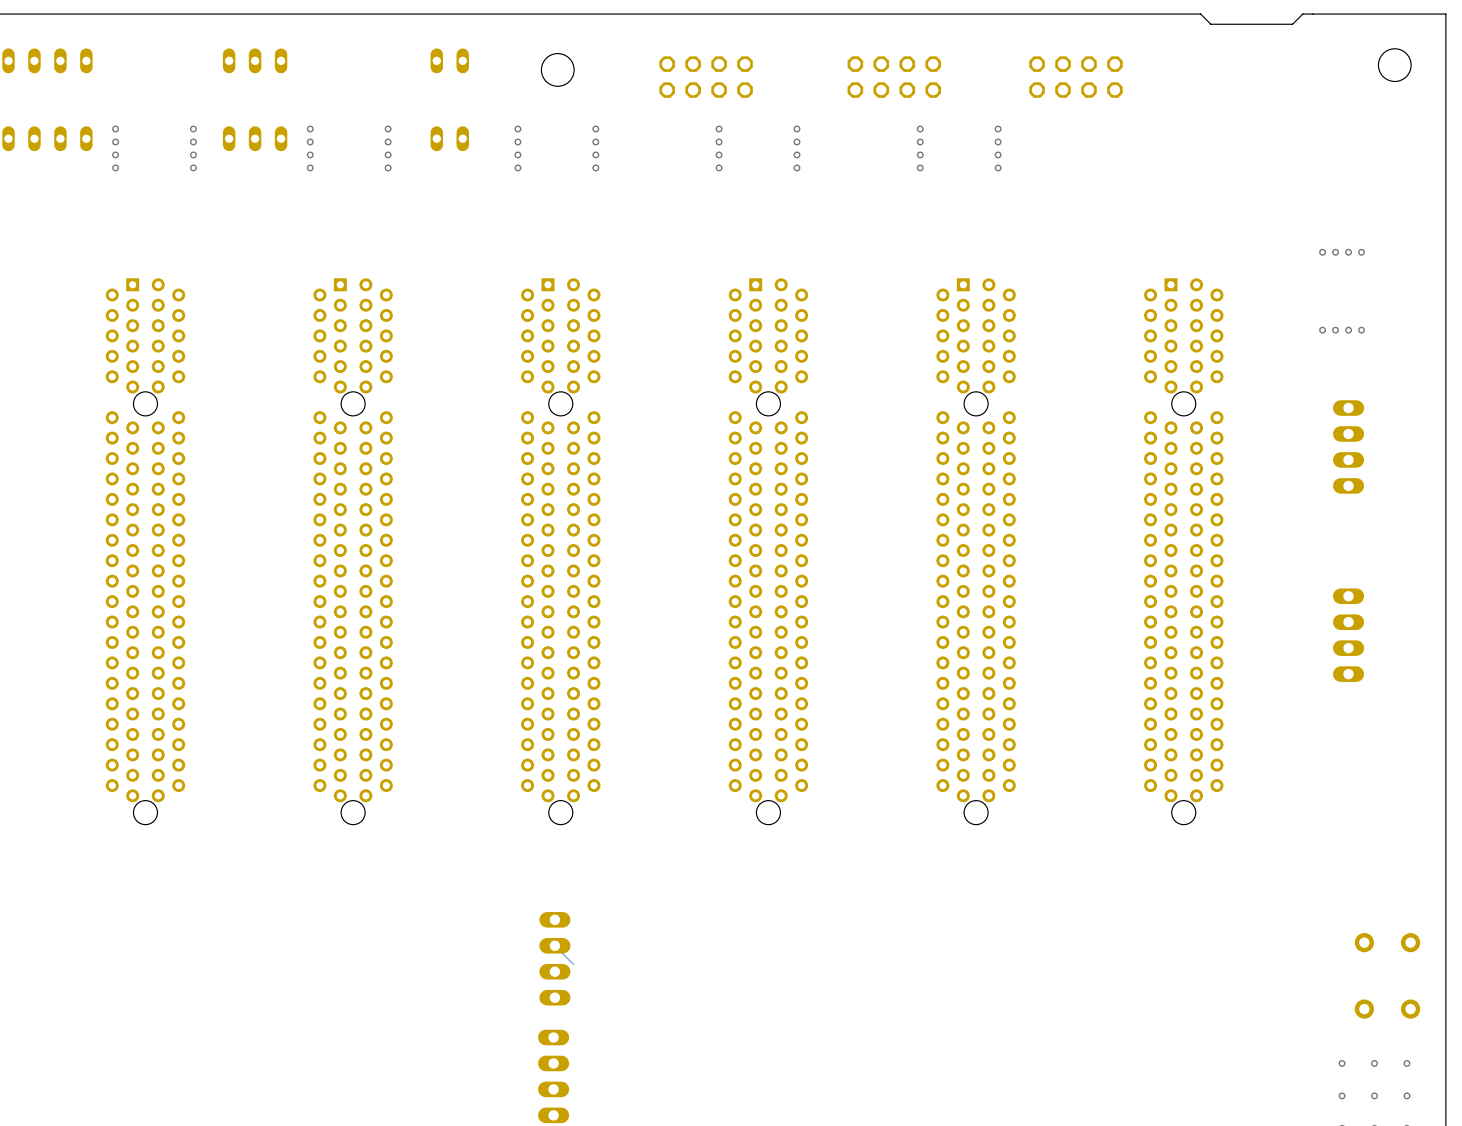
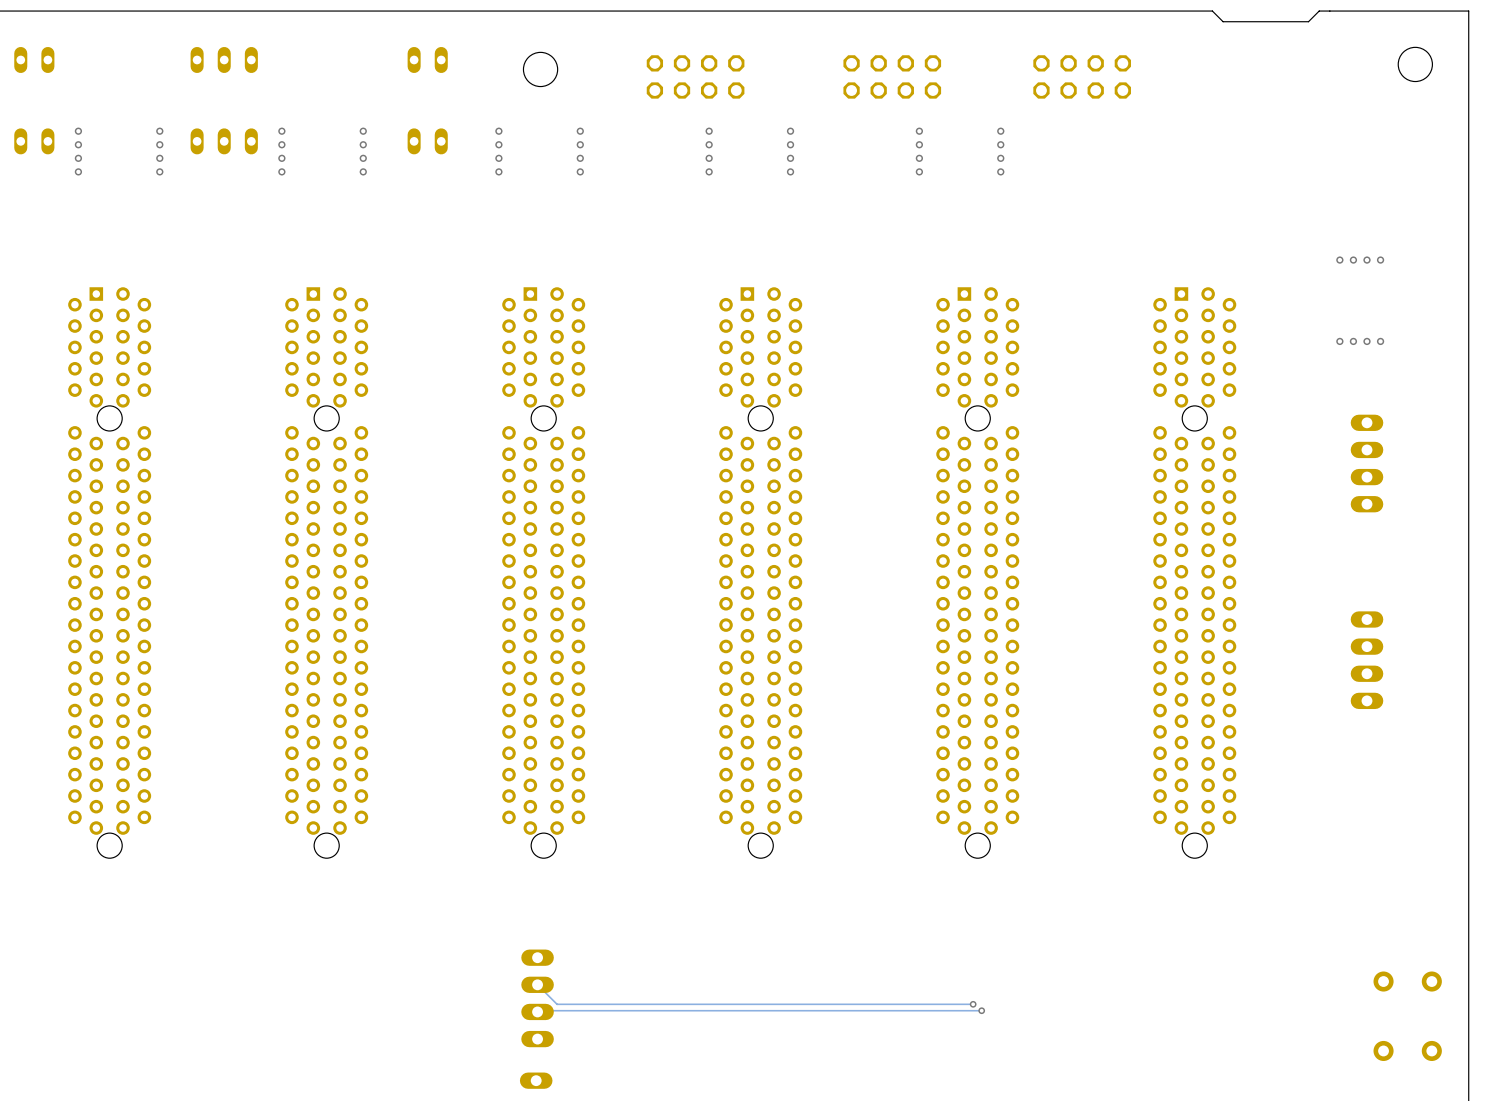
track: none -> (973, 1004) (557, 1004)
via: none -> (973, 1004)
track: none -> (981, 1010) (538, 1010)
via: none -> (981, 1010)

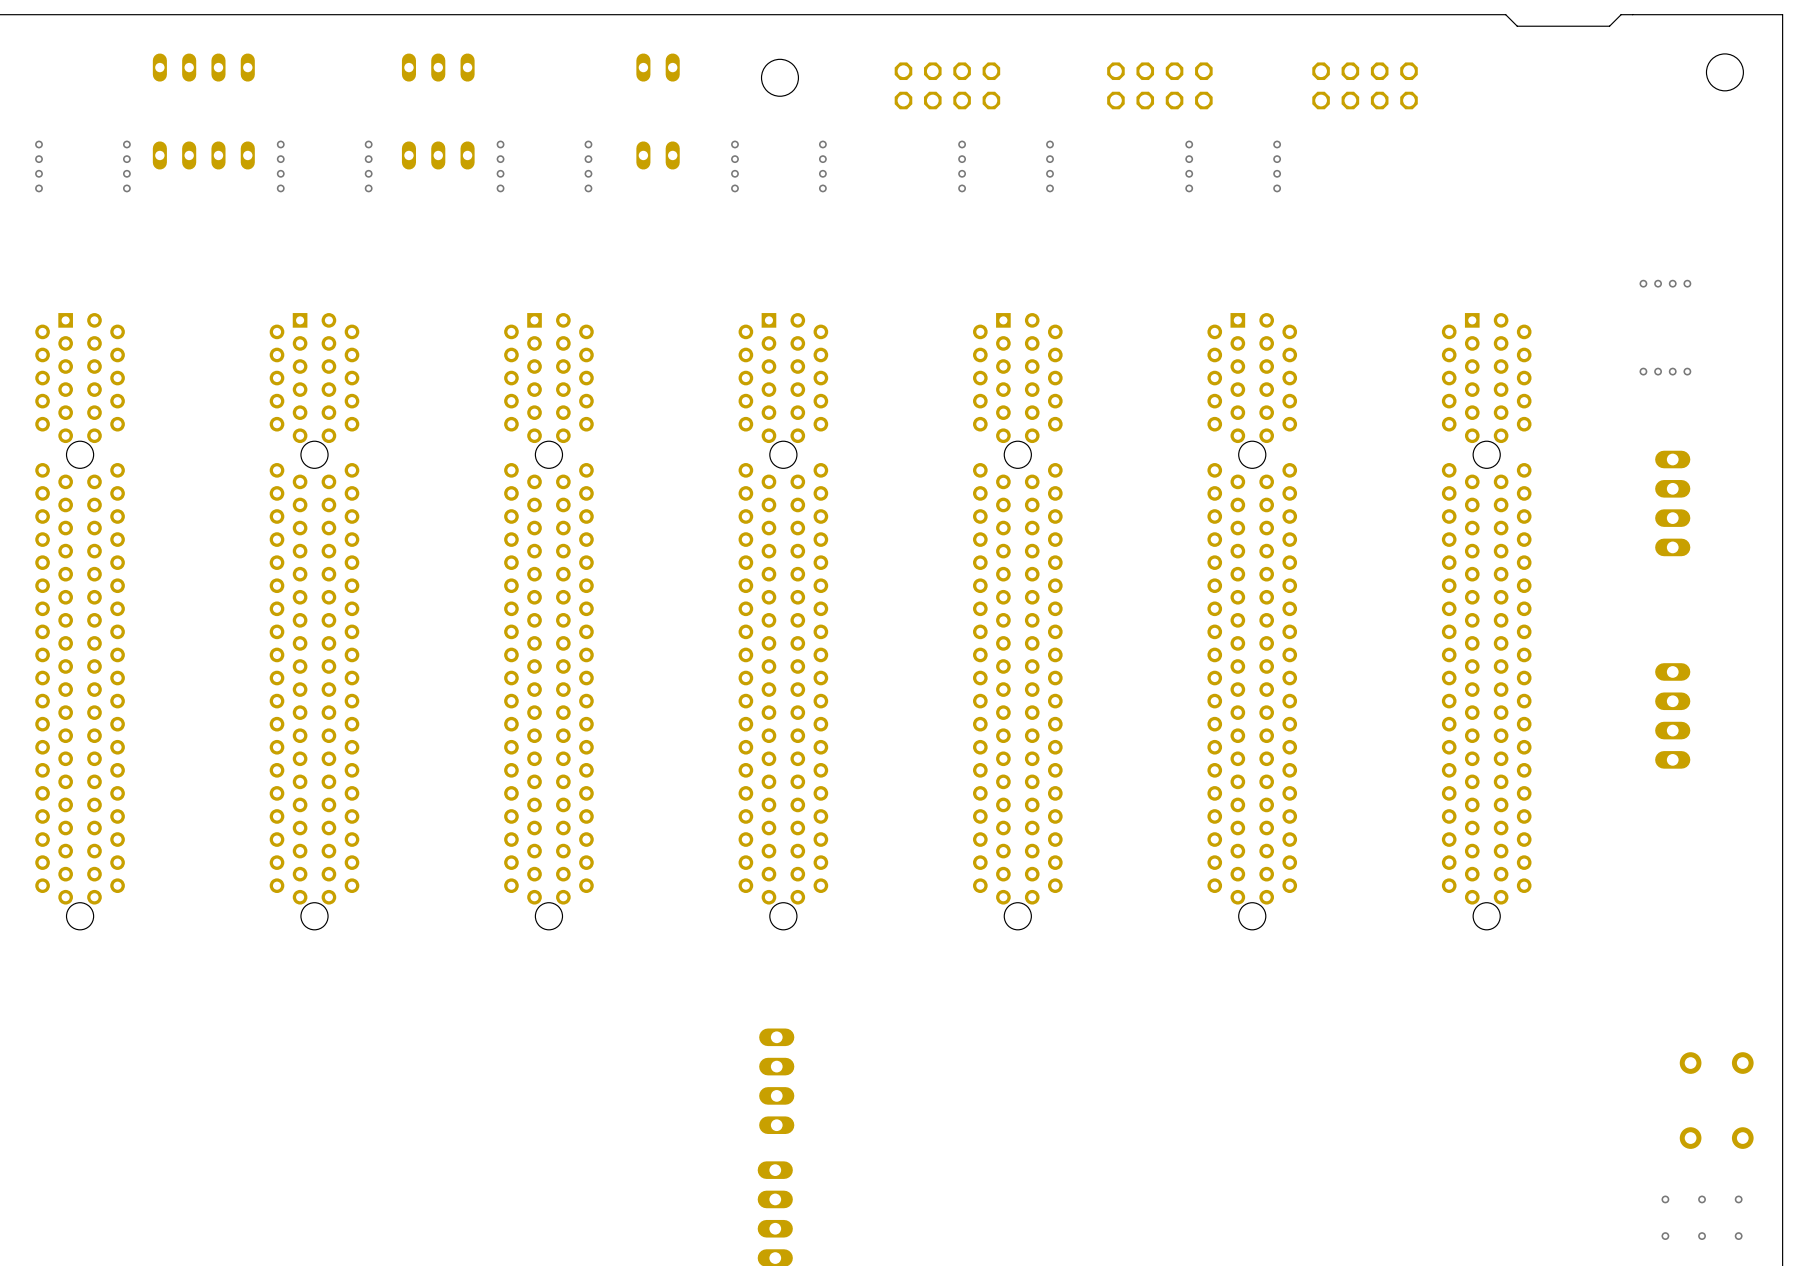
track: (537, 984) (557, 1004) (973, 1004) -> none
via: (973, 1004) -> none
track: (981, 1010) (537, 1011) -> none
via: (981, 1010) -> none

